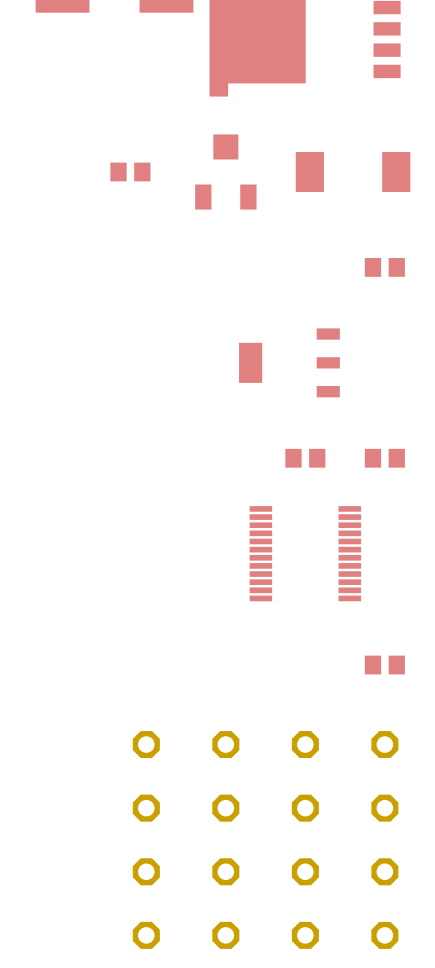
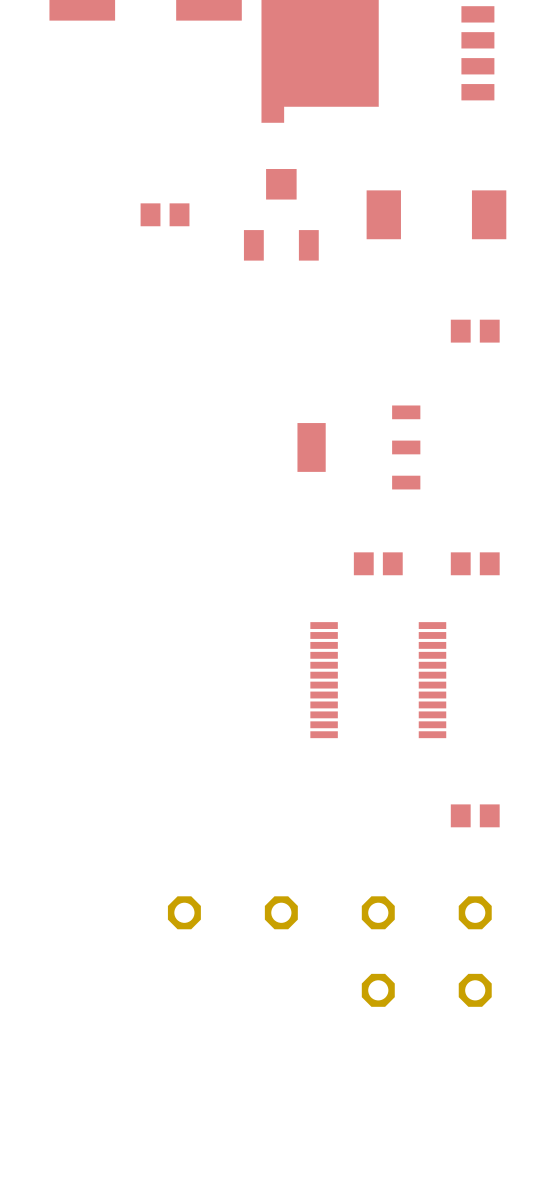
part: (146, 808) -> none
part: (225, 808) -> none
part: (146, 871) -> none
part: (225, 871) -> none
part: (305, 871) -> none
part: (384, 871) -> none
part: (146, 935) -> none
part: (225, 935) -> none
part: (305, 935) -> none
part: (384, 935) -> none

